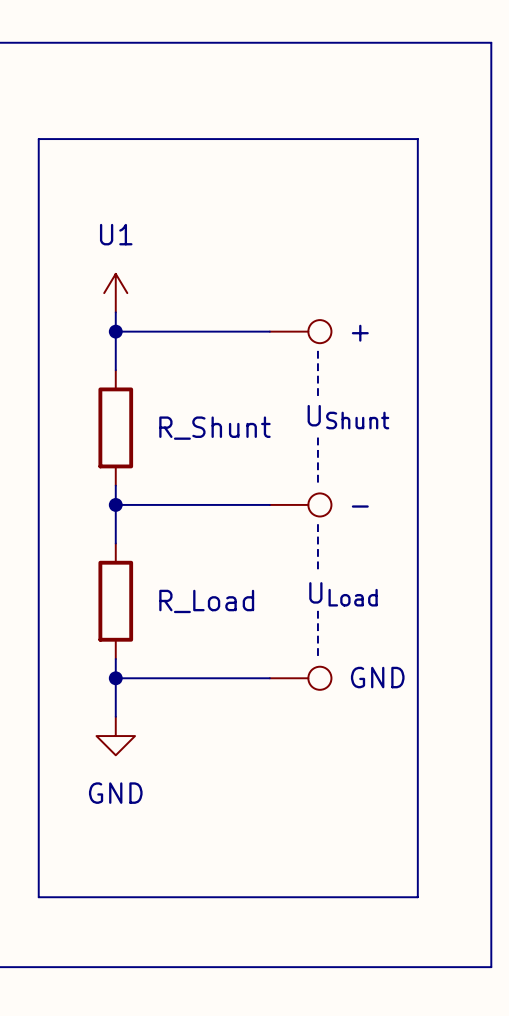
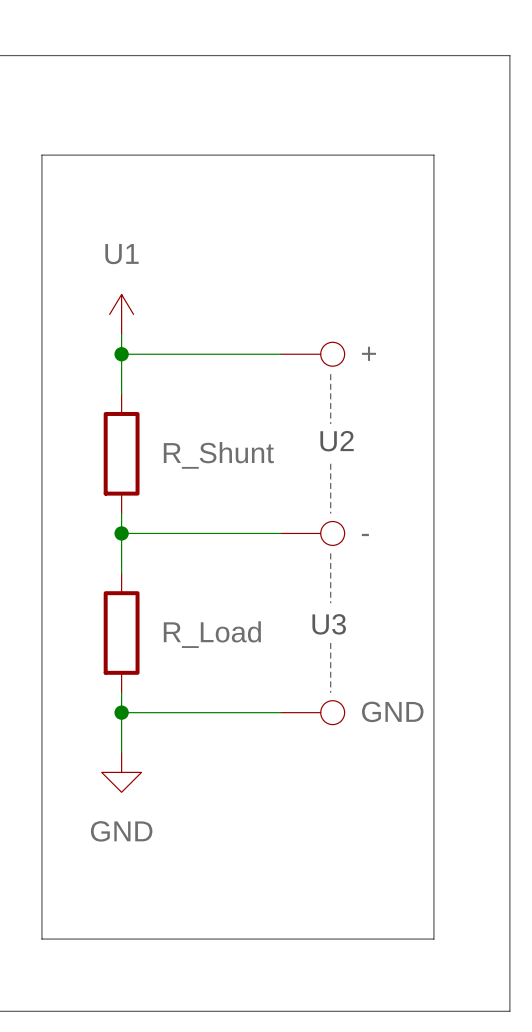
text: none -> U2 (337, 441)
text: UShunt (348, 417) -> none
text: none -> U3 (329, 624)
text: ULoad (343, 594) -> none

